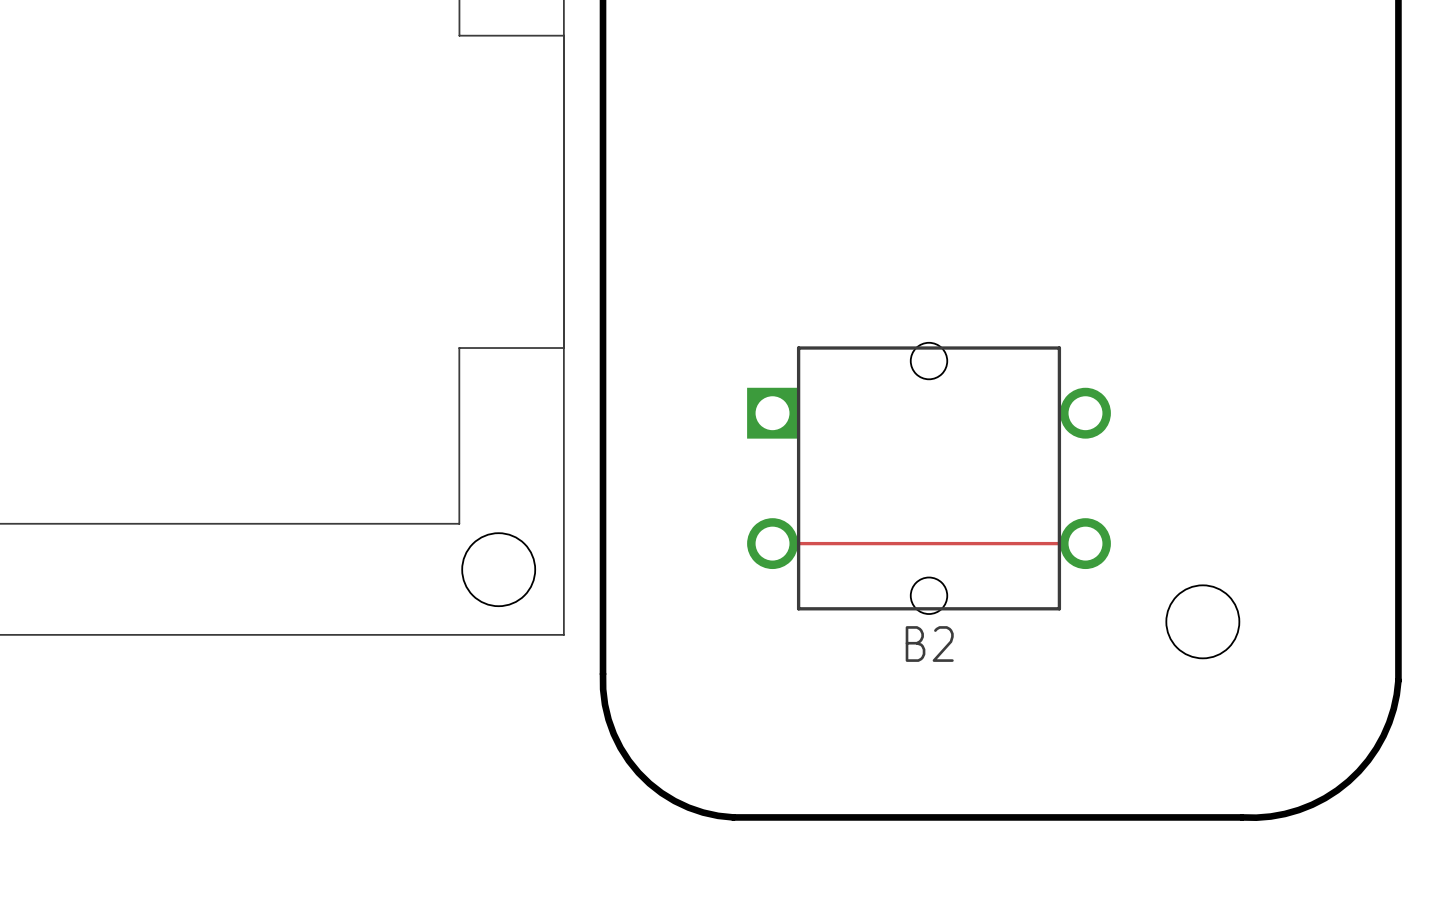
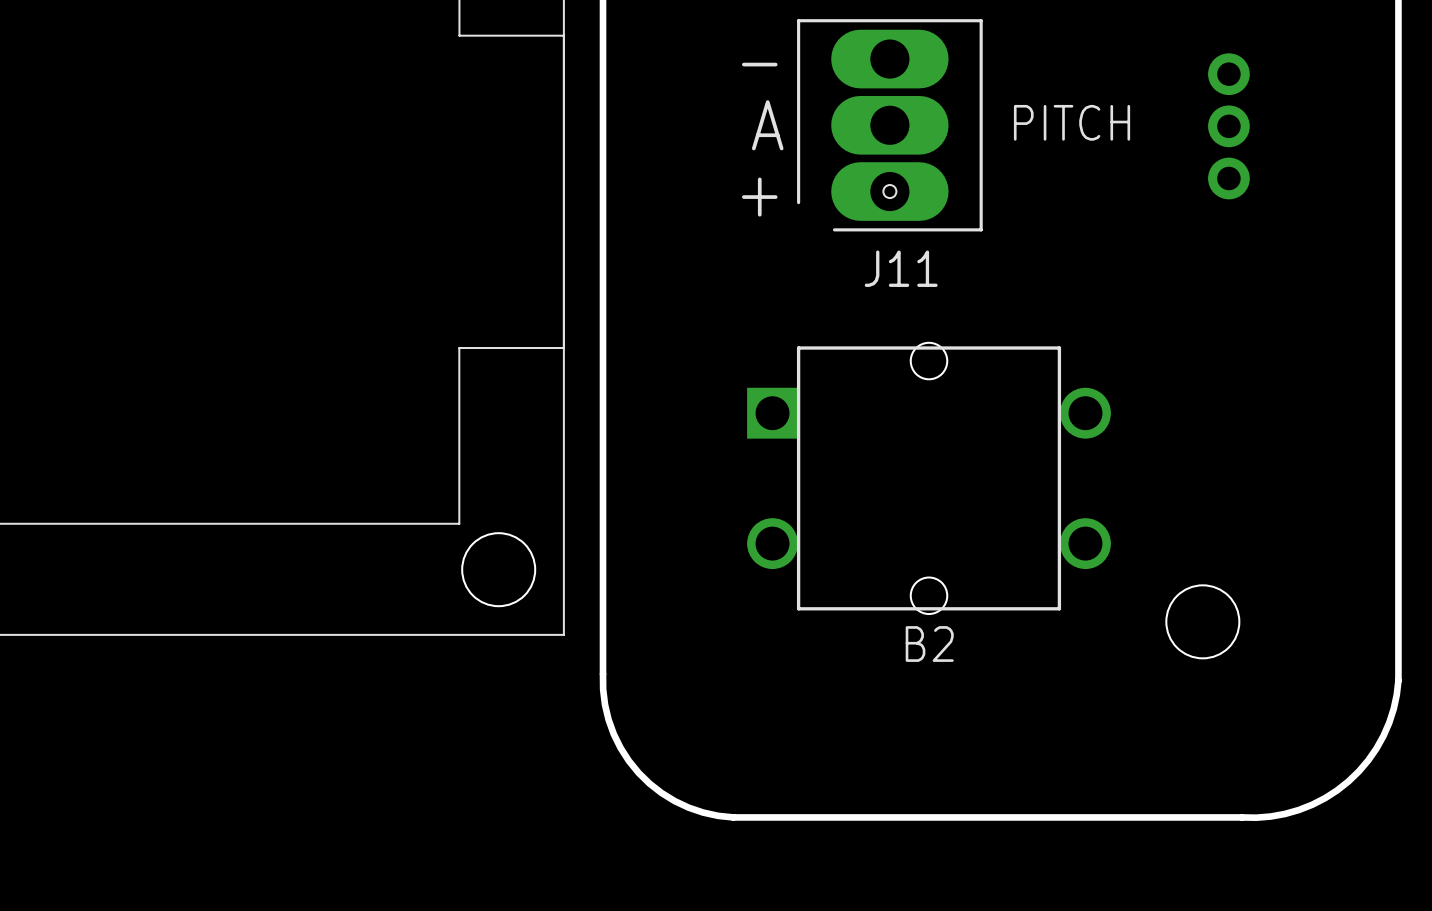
text: none -> PITCH (1072, 122)
J11: none -> (889, 125)
part: none -> (1228, 126)
track: (772, 543) (1085, 543) -> none

